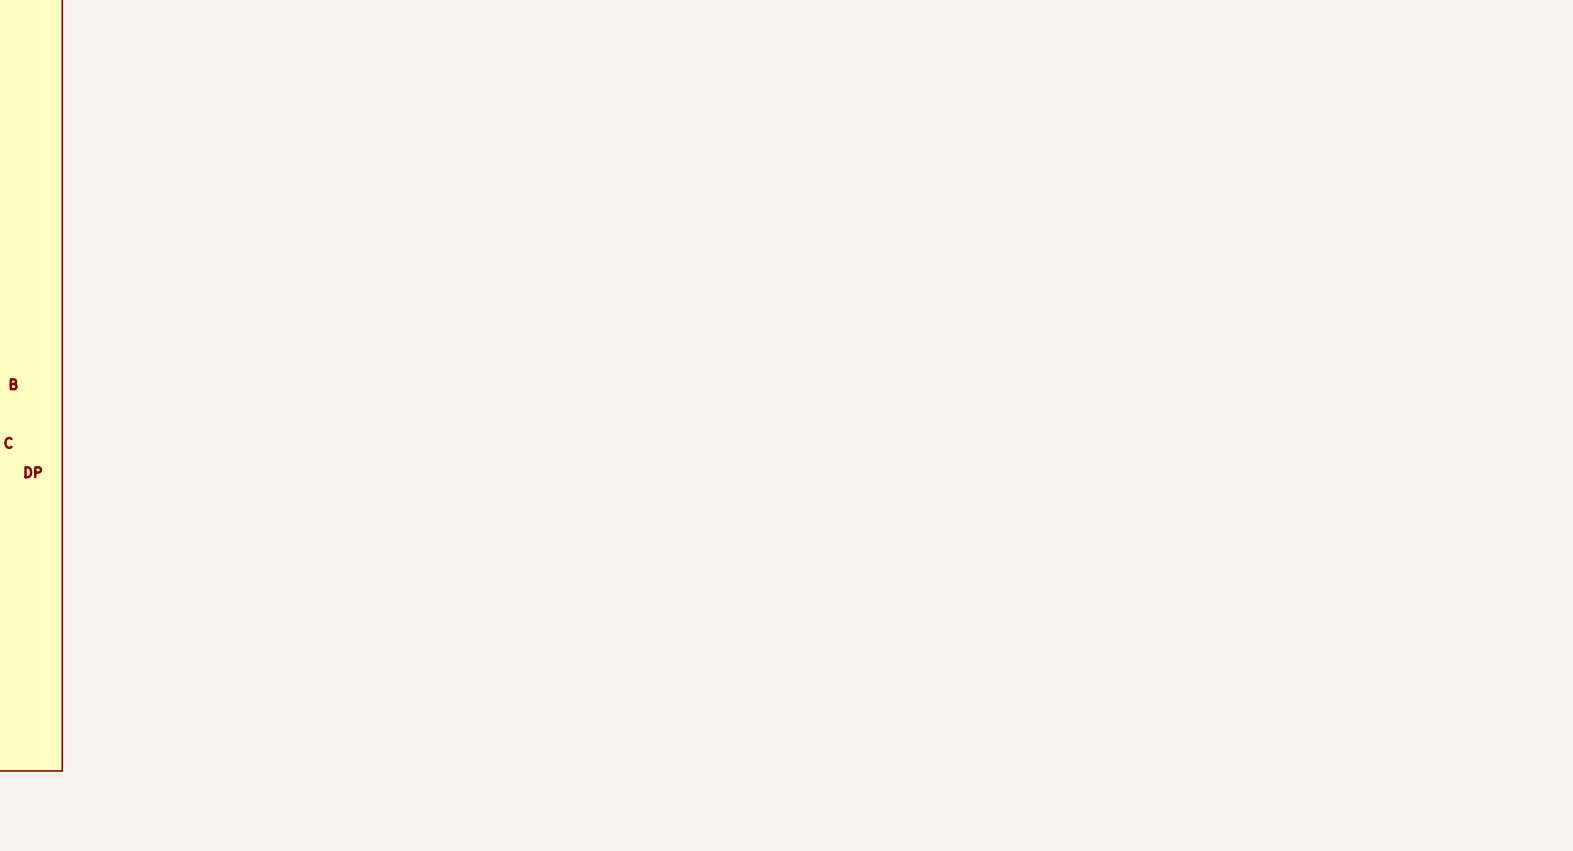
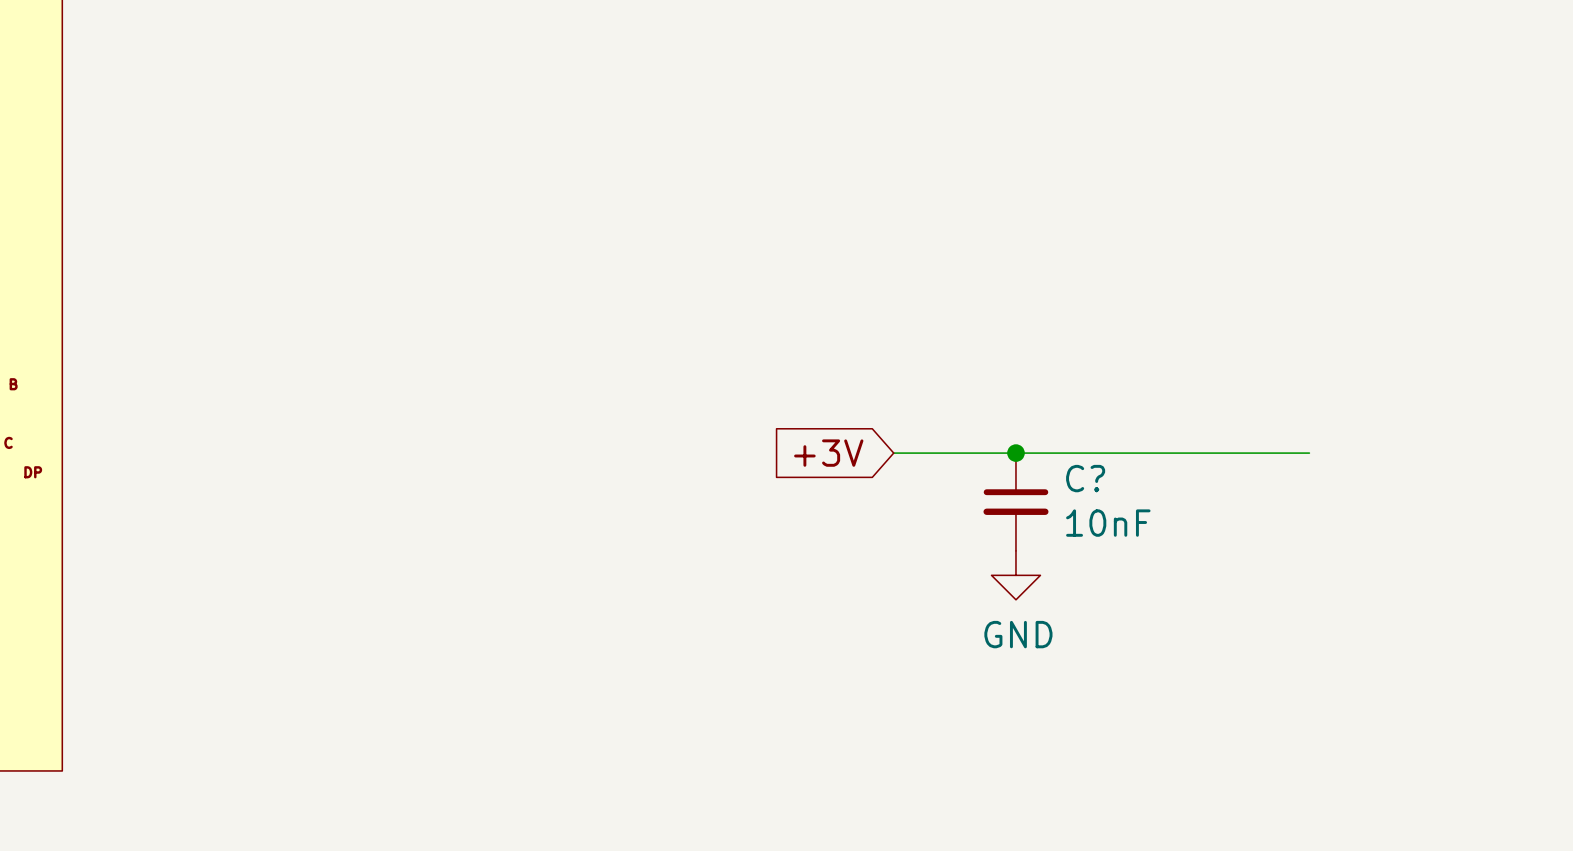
global label: none -> +3V (828, 453)
wire: none -> (893, 453) (1309, 453)
junction: none -> (1015, 453)
C?: none -> 10nF (1015, 501)
power symbol: none -> GND (1015, 575)

